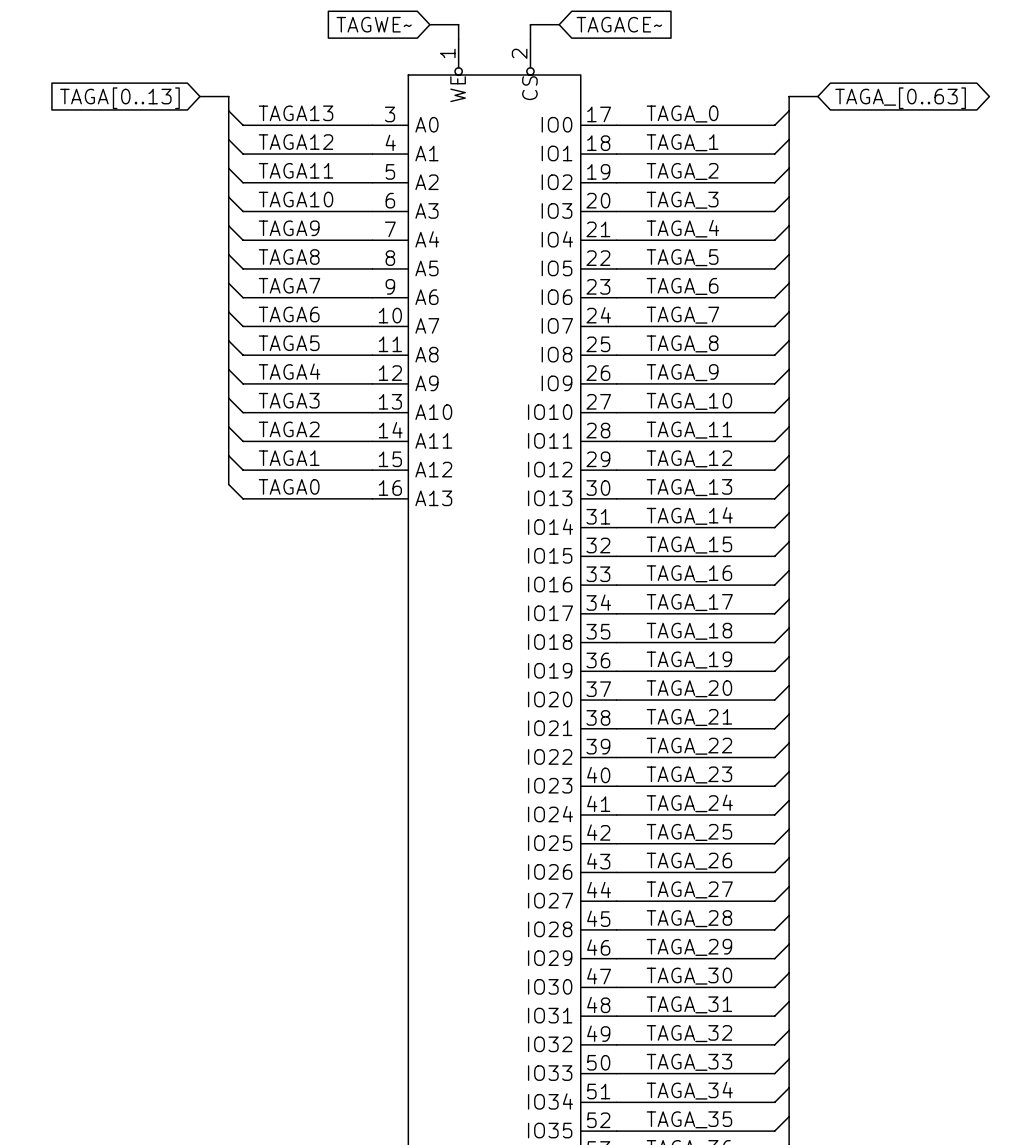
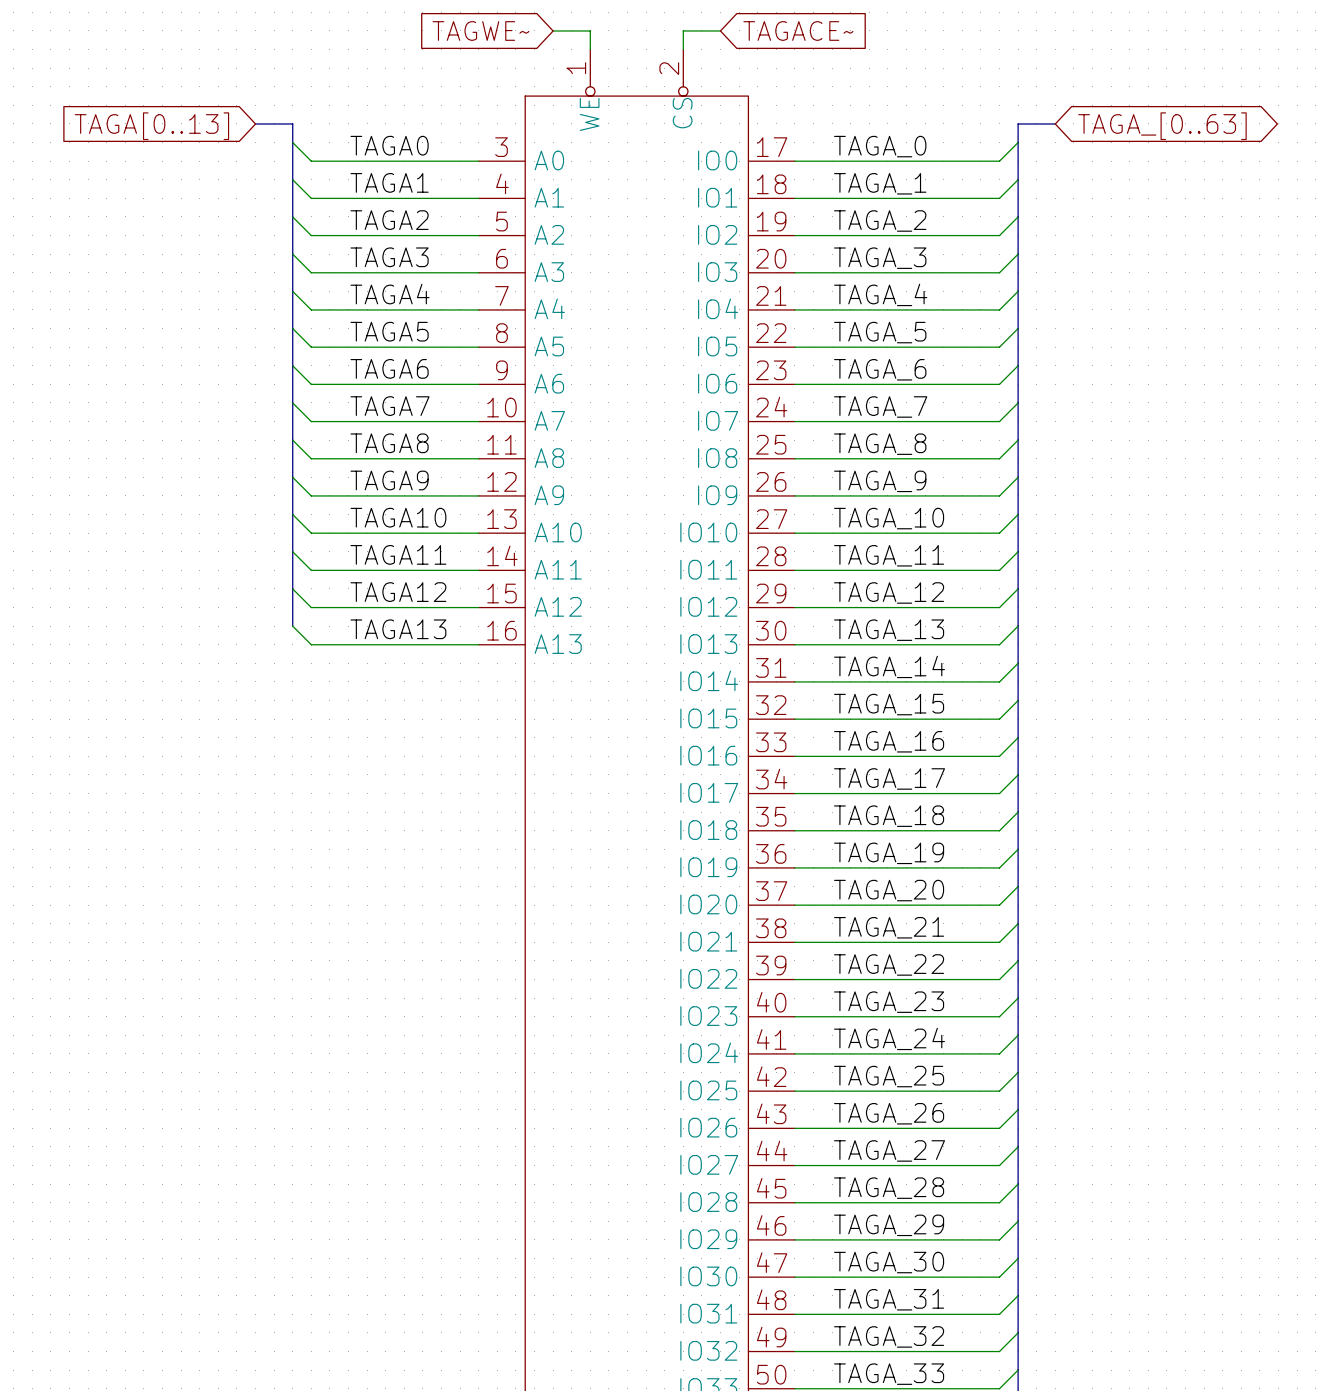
label: TAGA13 (296, 113) -> TAGA0 (389, 145)
label: TAGA12 (296, 142) -> TAGA1 (389, 182)
label: TAGA11 (296, 170) -> TAGA2 (389, 220)
label: TAGA10 (296, 199) -> TAGA3 (389, 257)
label: TAGA9 (289, 228) -> TAGA4 (390, 294)
label position: TAGA8 (289, 257) -> TAGA8 (389, 443)
label position: TAGA7 (289, 285) -> TAGA7 (390, 406)
label position: TAGA6 (289, 314) -> TAGA6 (389, 368)
label position: TAGA5 (289, 343) -> TAGA5 (389, 331)
label: TAGA4 (289, 371) -> TAGA9 (389, 480)
label: TAGA3 (289, 400) -> TAGA10 (398, 517)
label: TAGA2 (289, 429) -> TAGA11 (398, 554)
label: TAGA1 (289, 458) -> TAGA12 (398, 592)
label: TAGA0 (289, 486) -> TAGA13 (398, 629)

